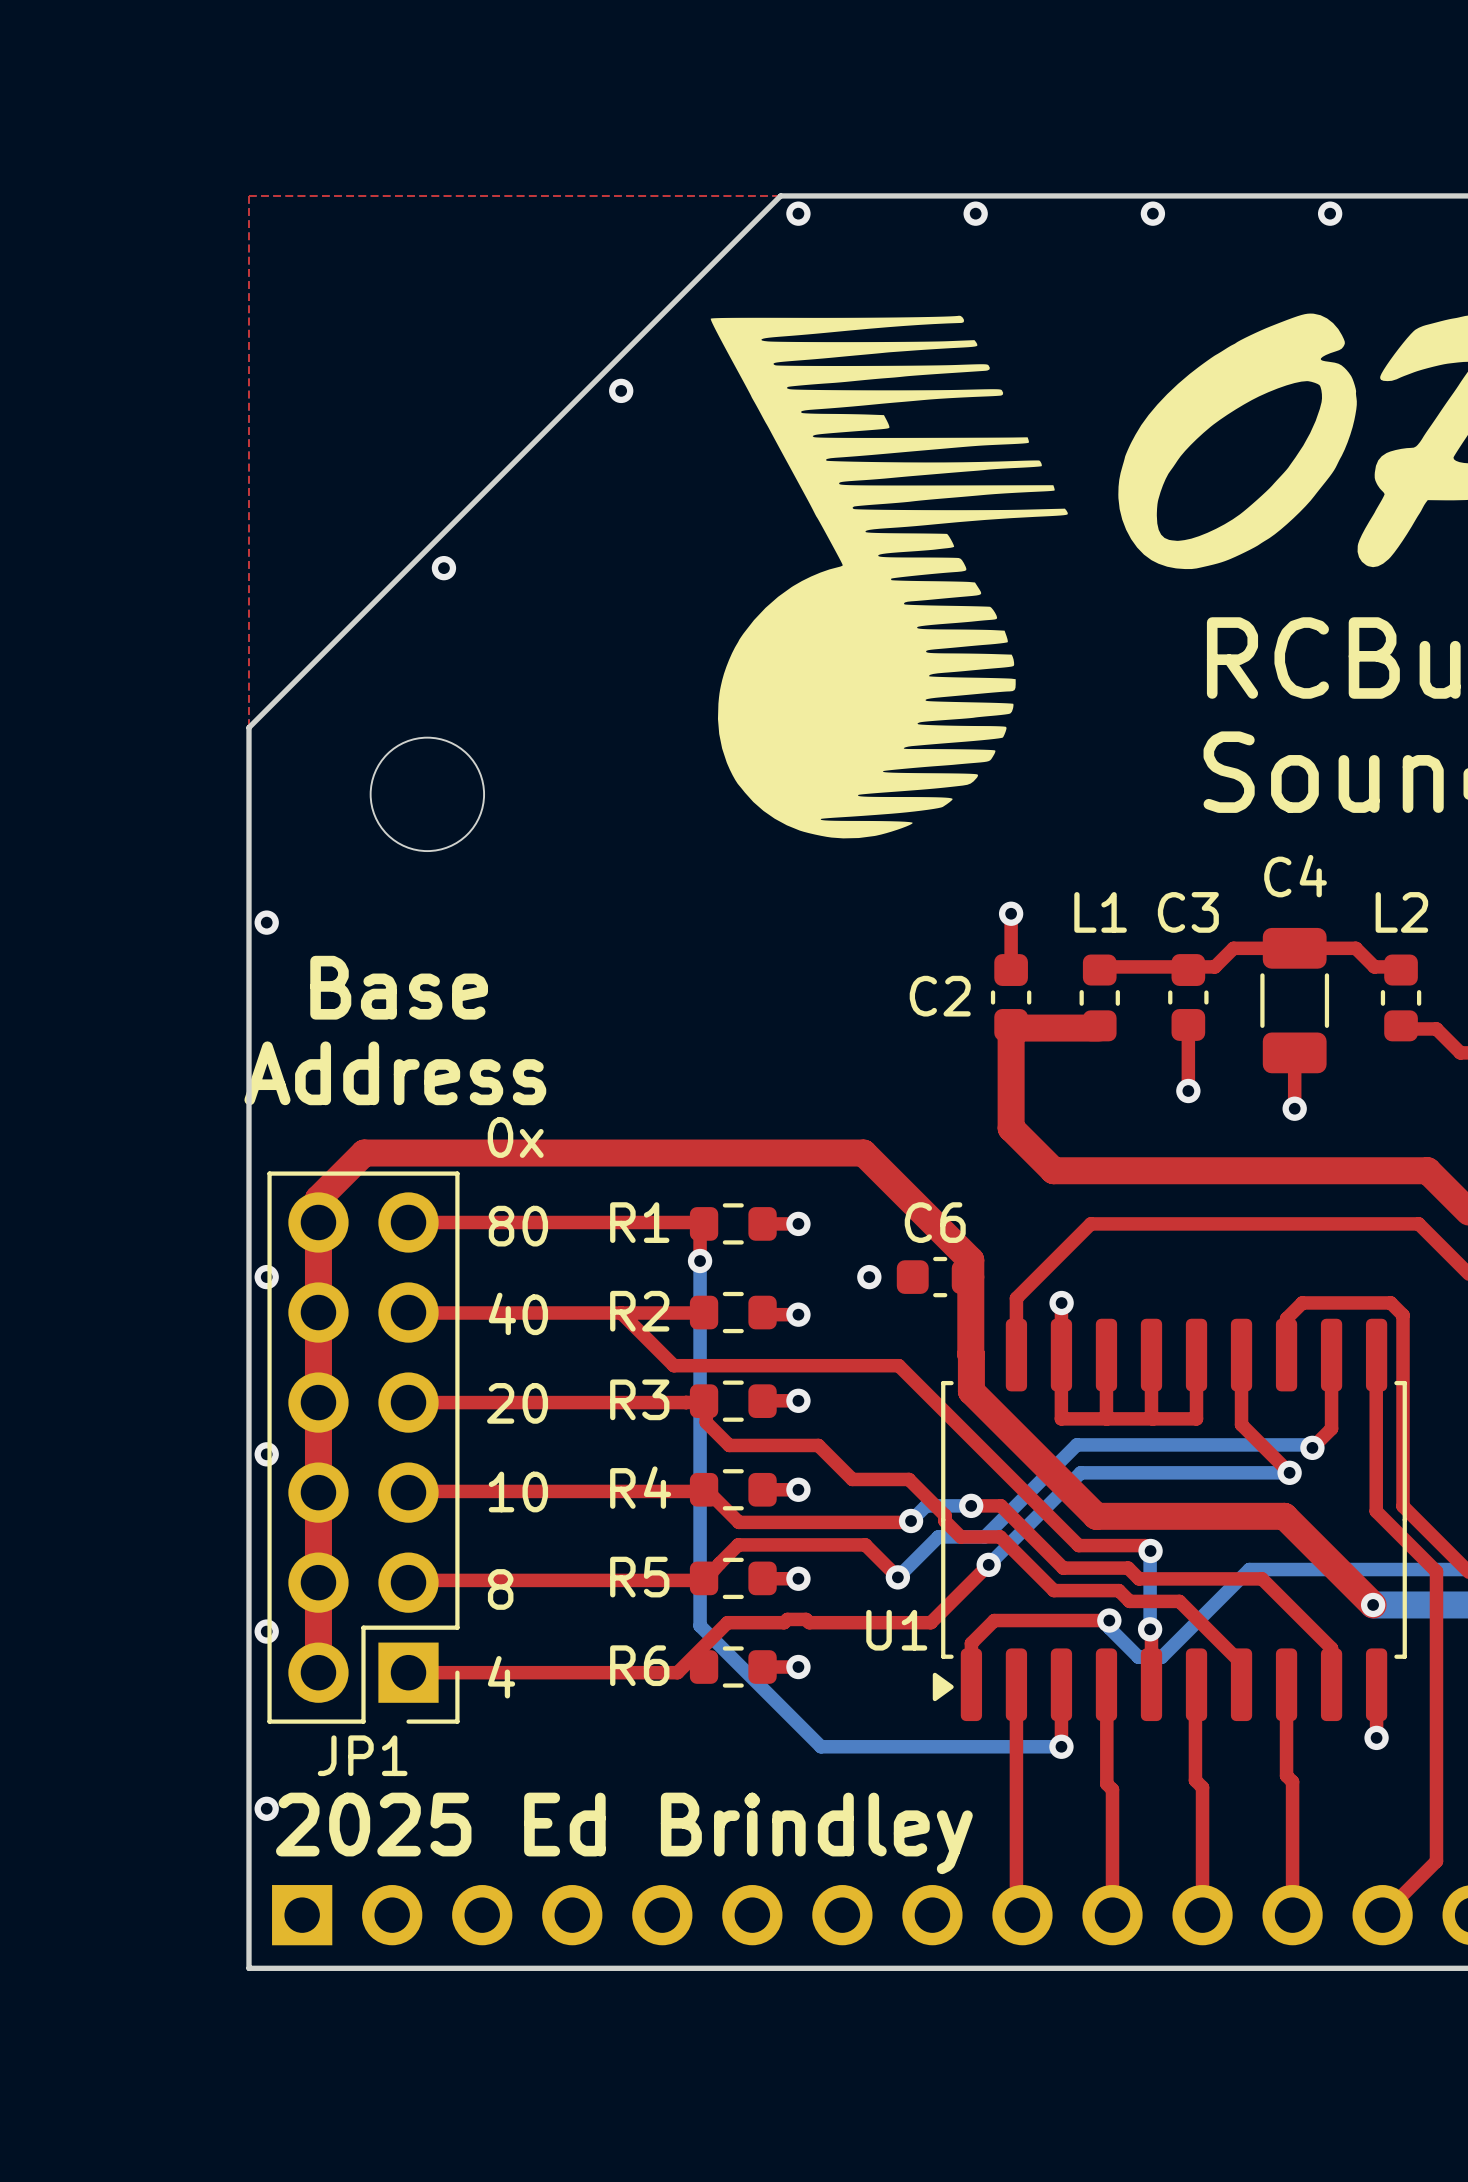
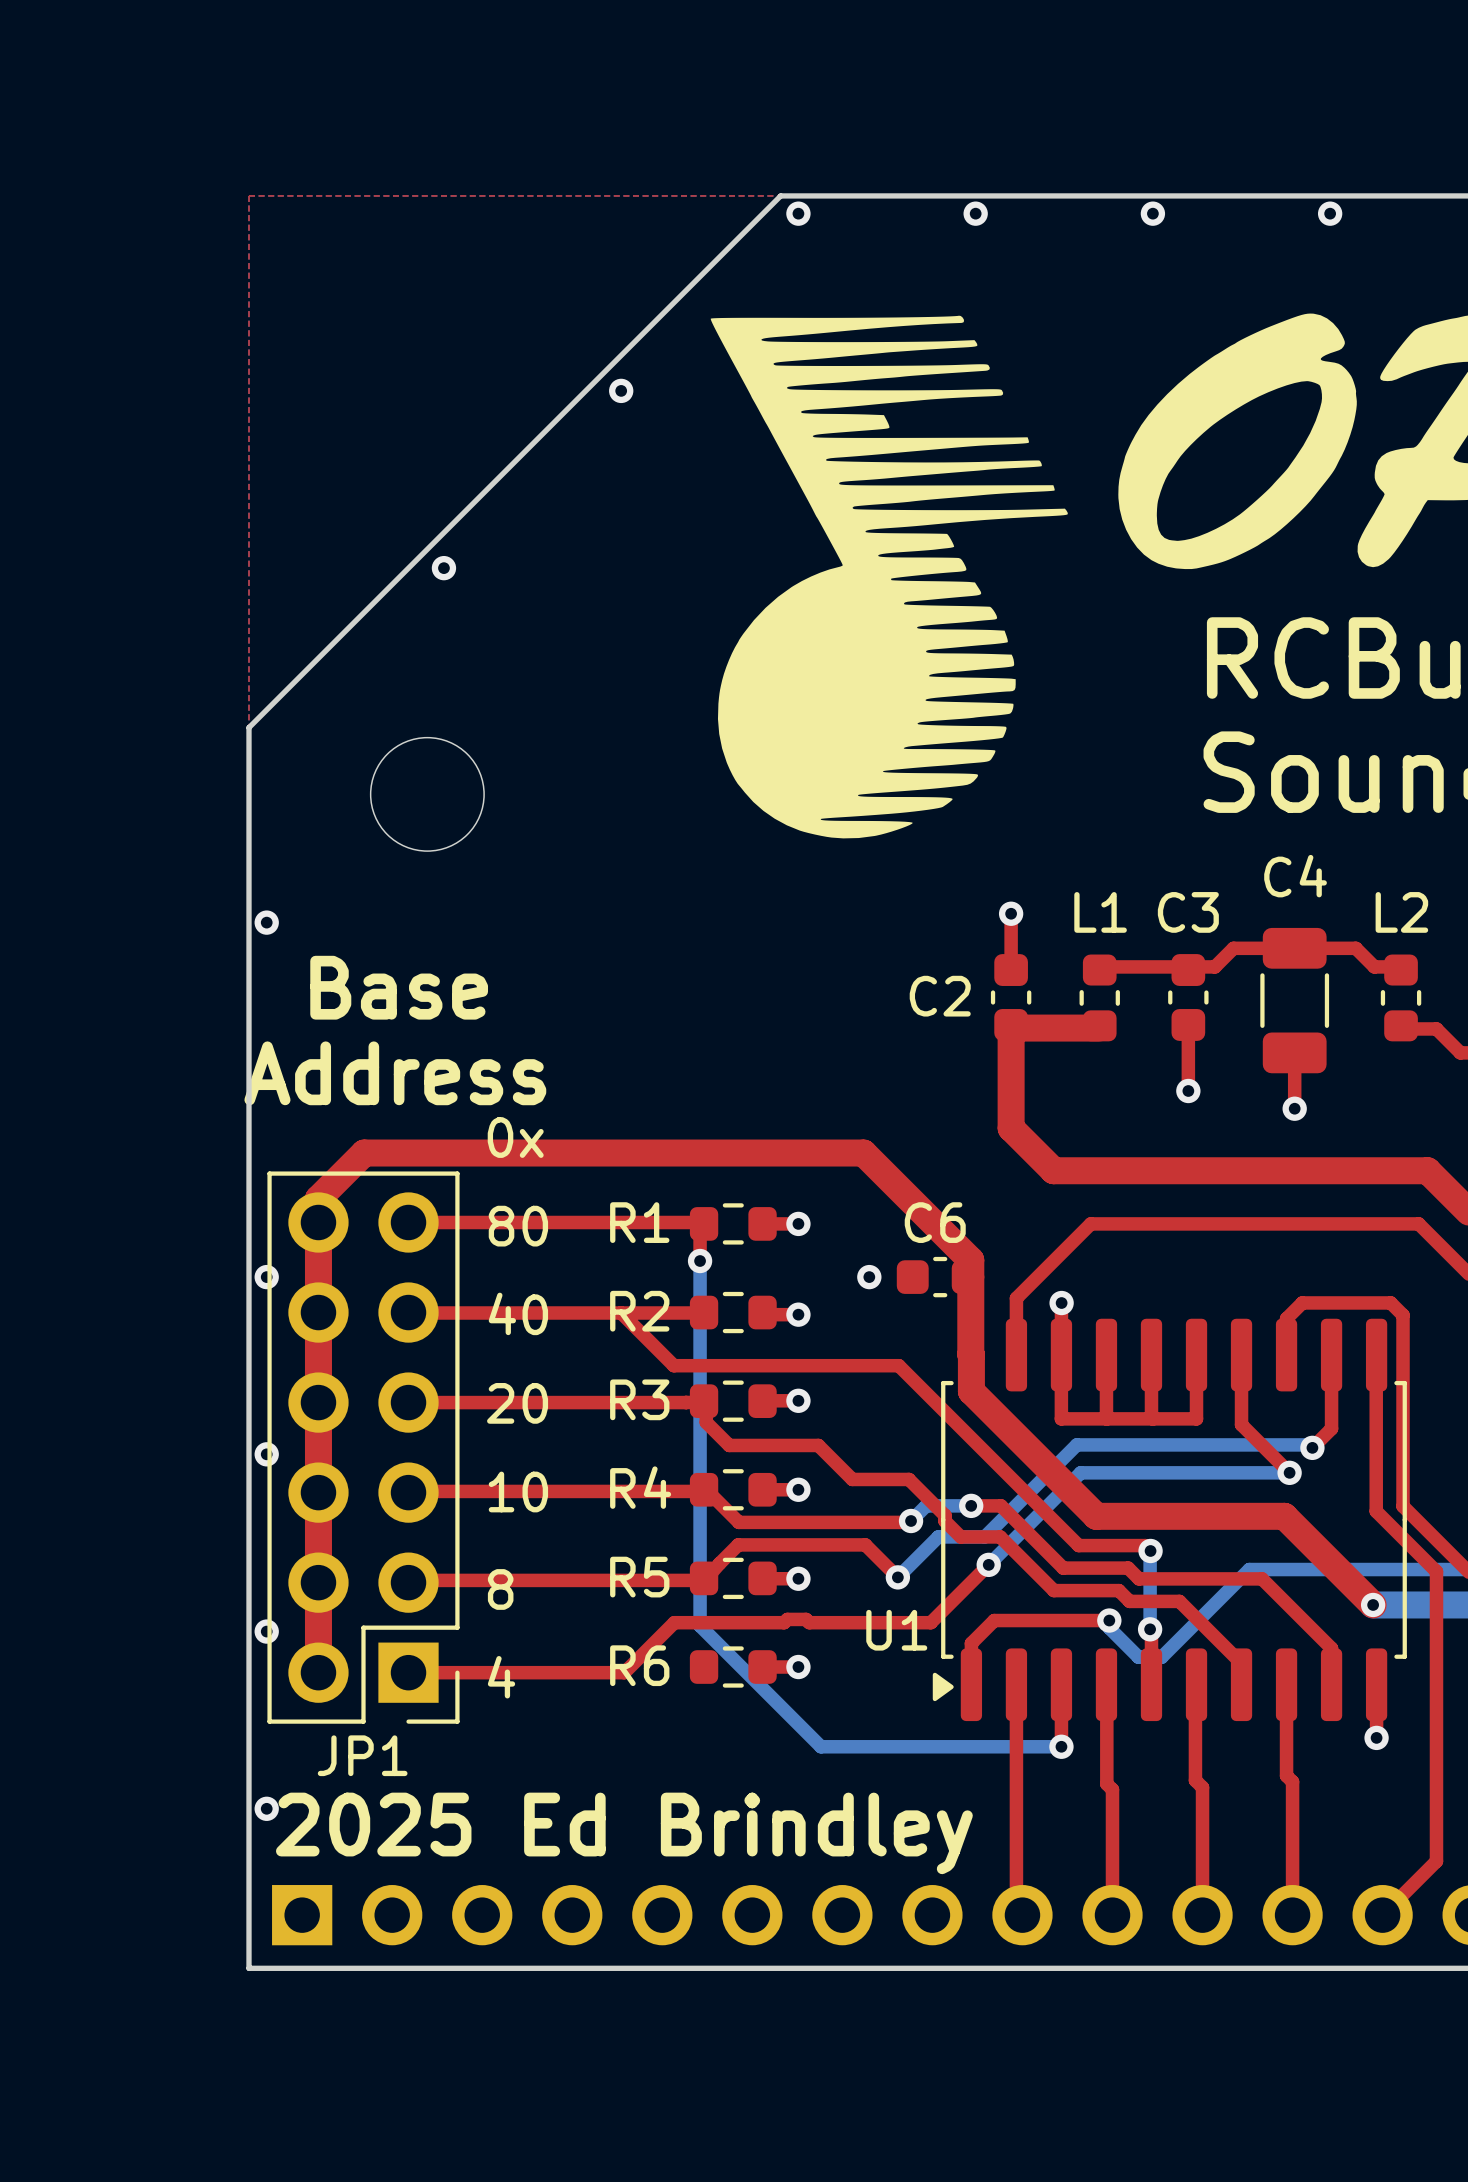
top track: (727, 1622) (677, 1672) (624, 1672) -> (727, 1622) (674, 1622) (624, 1672)

